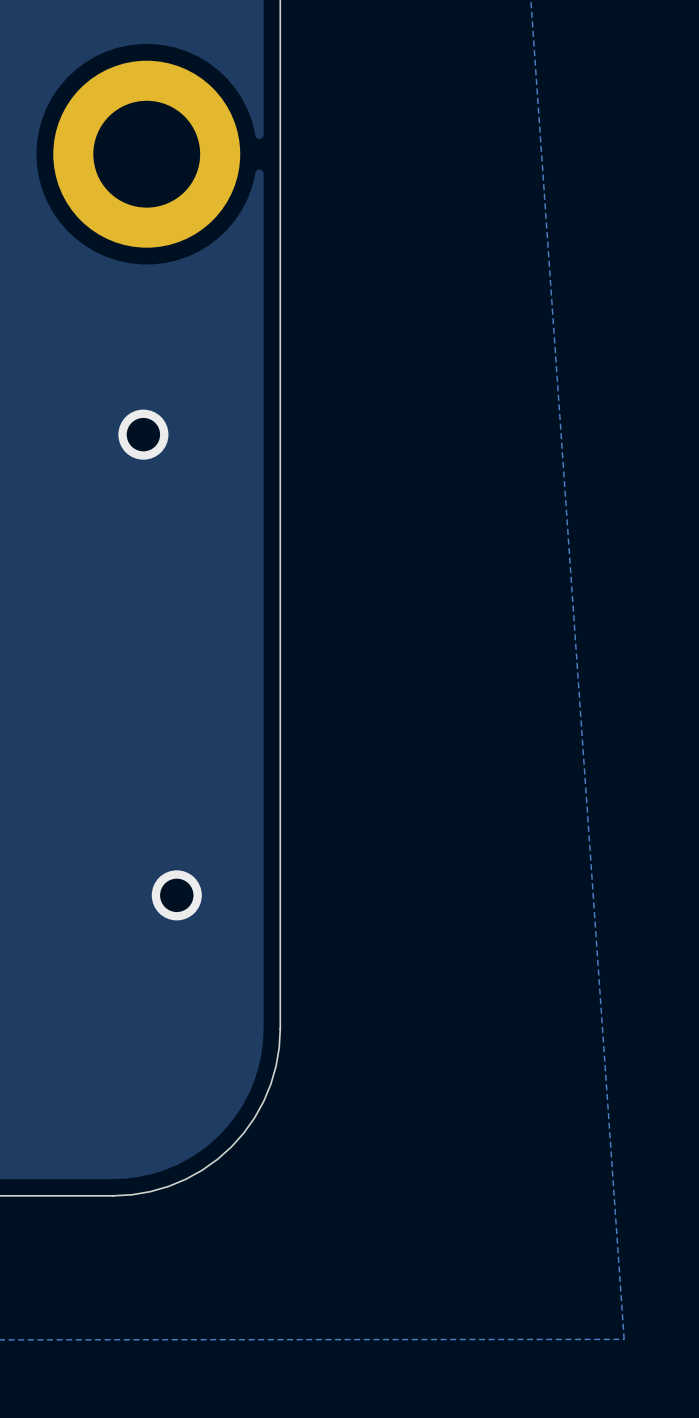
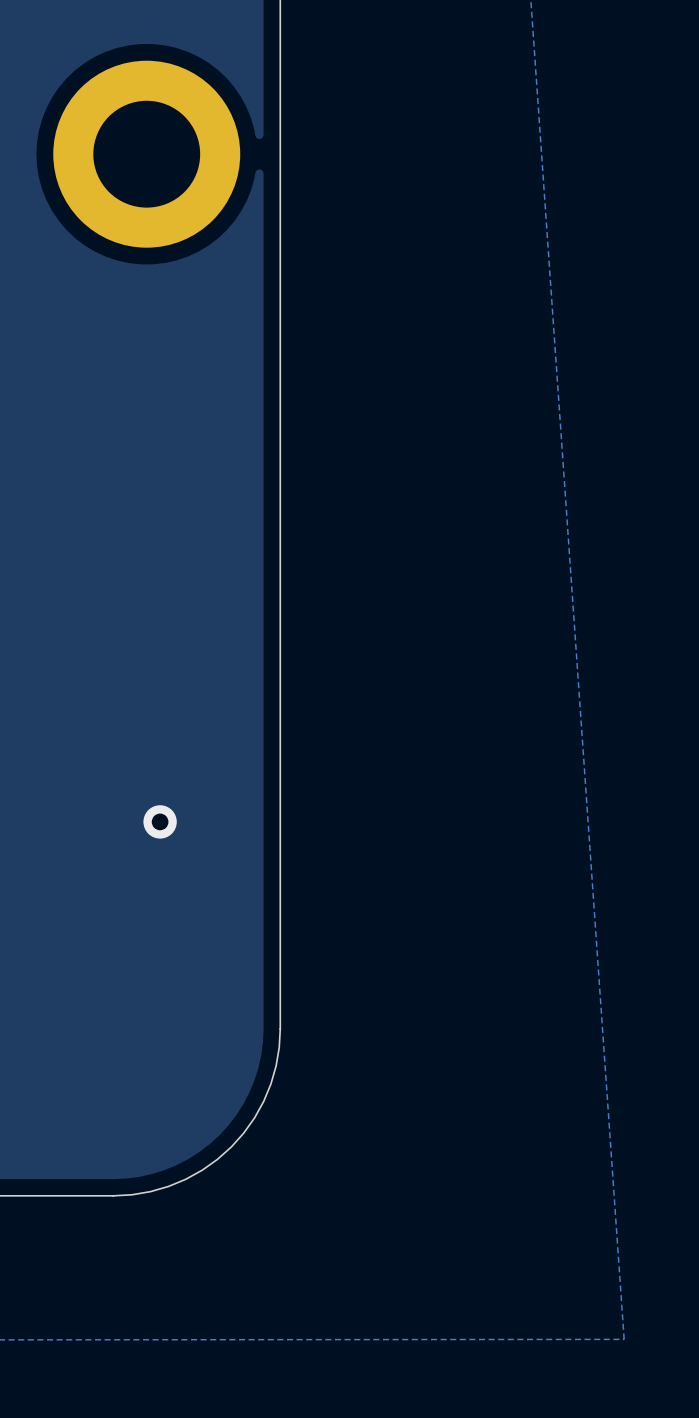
via: (143, 434) -> none
via: none -> (160, 821)
via: (176, 895) -> none

